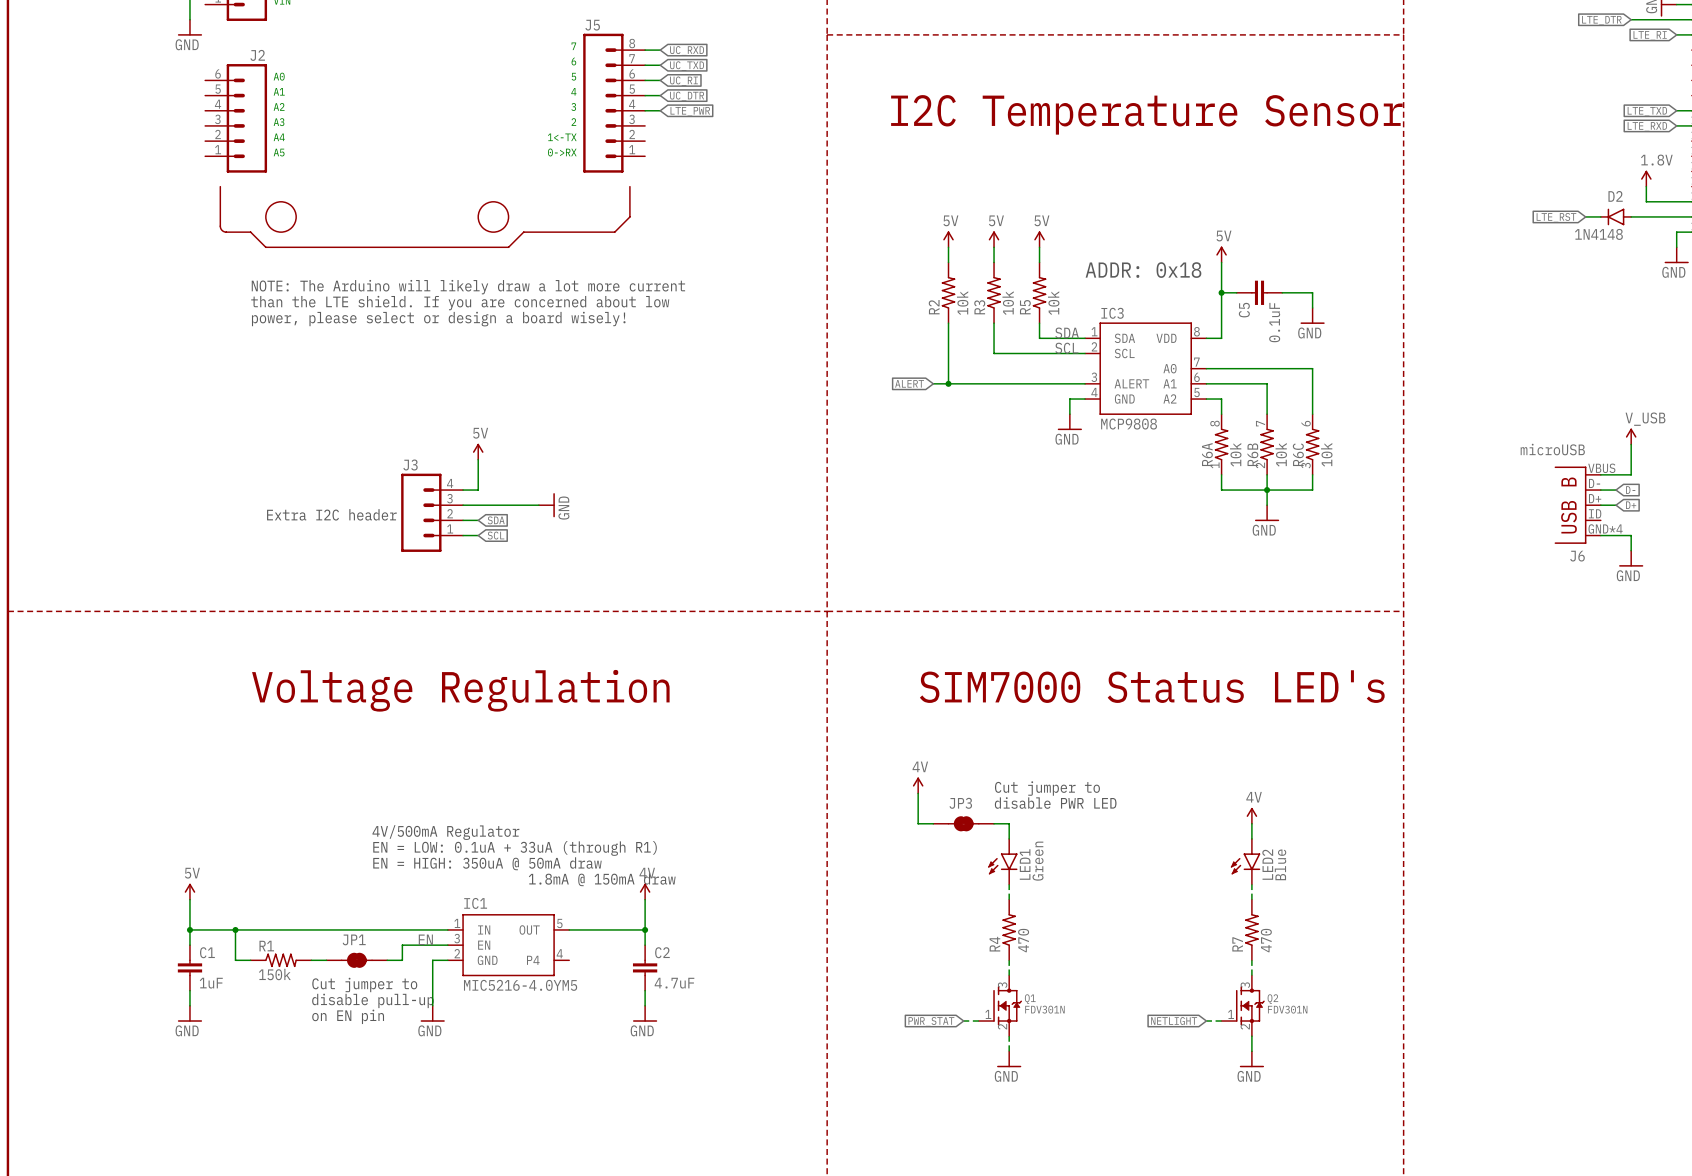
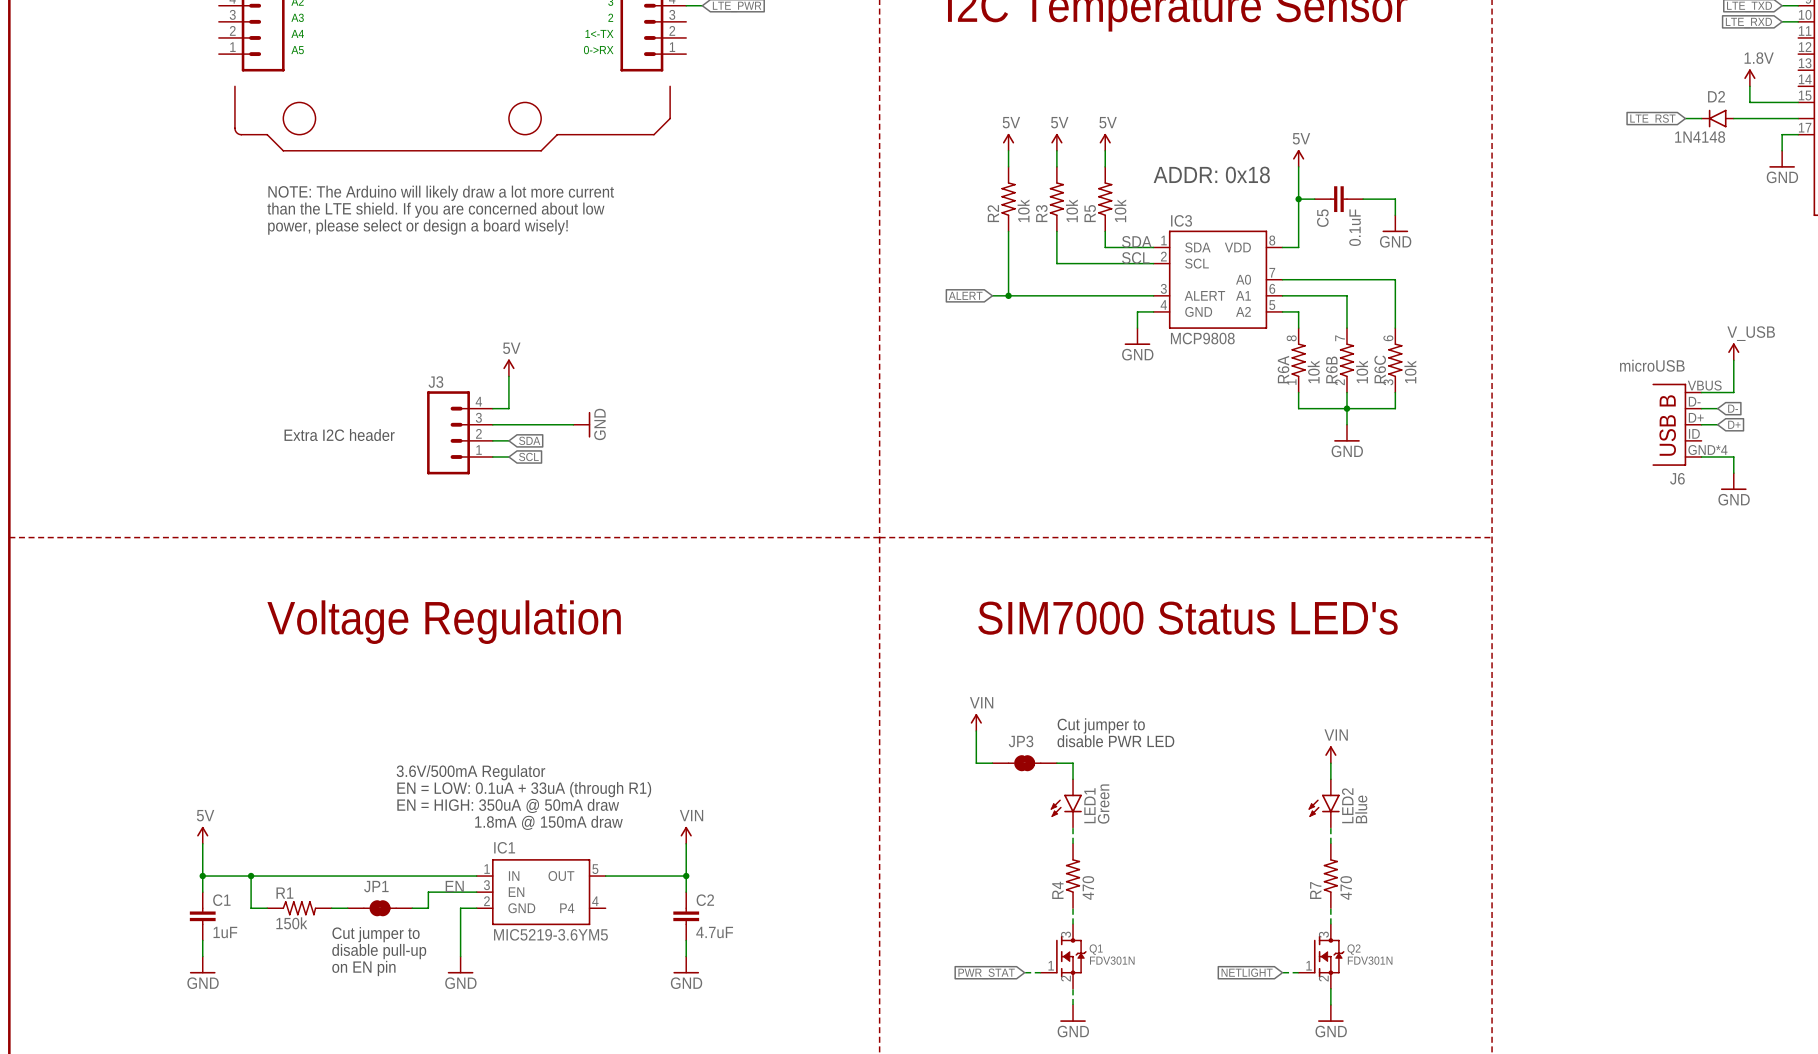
power symbol: 4V (918, 785) -> VIN (976, 722)
power symbol: 4V (1251, 815) -> VIN (1330, 754)
text: 4V/500mA Regulator (445, 832) -> 3.6V/500mA Regulator (470, 772)
power symbol: 4V (645, 891) -> VIN (686, 835)
IC1 value: MIC5216-4.0YM5 (520, 985) -> MIC5219-3.6YM5 (550, 934)

